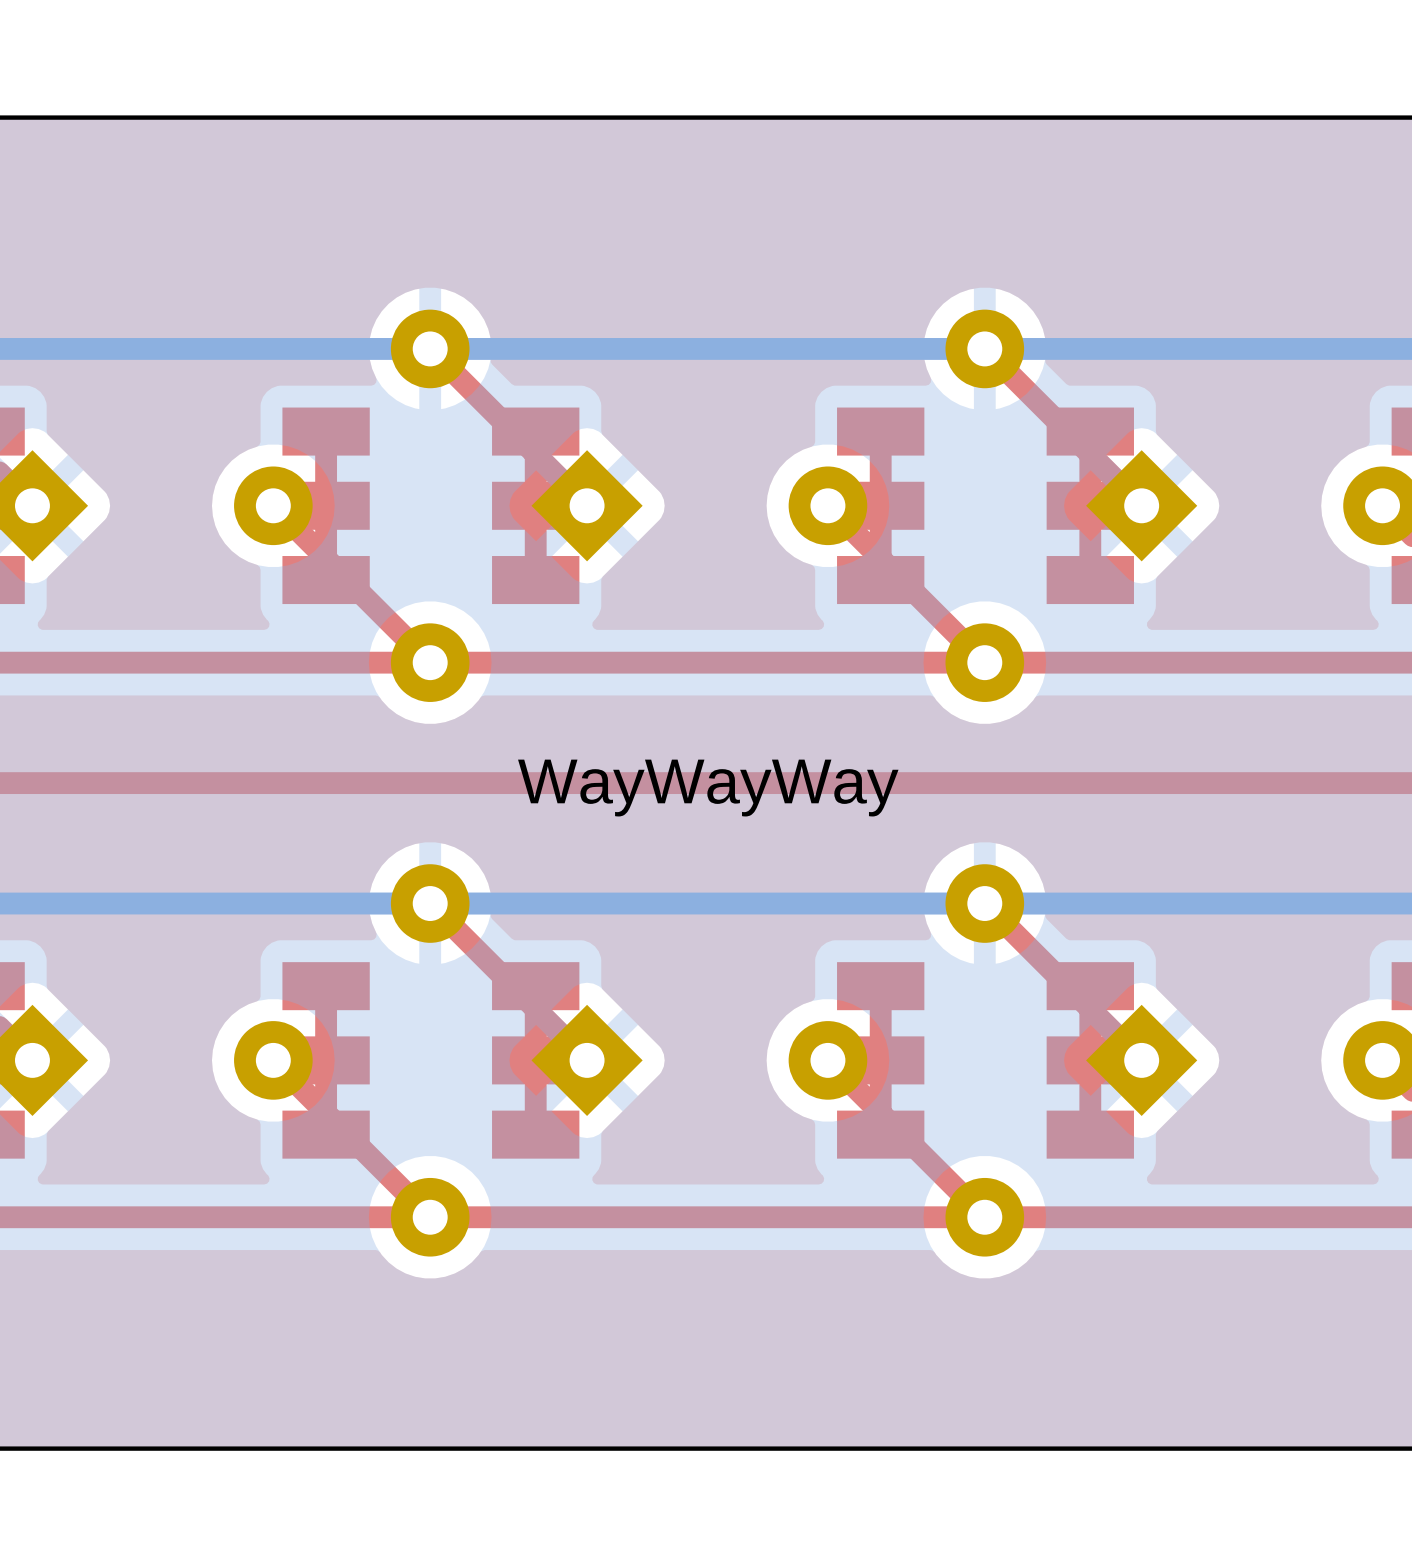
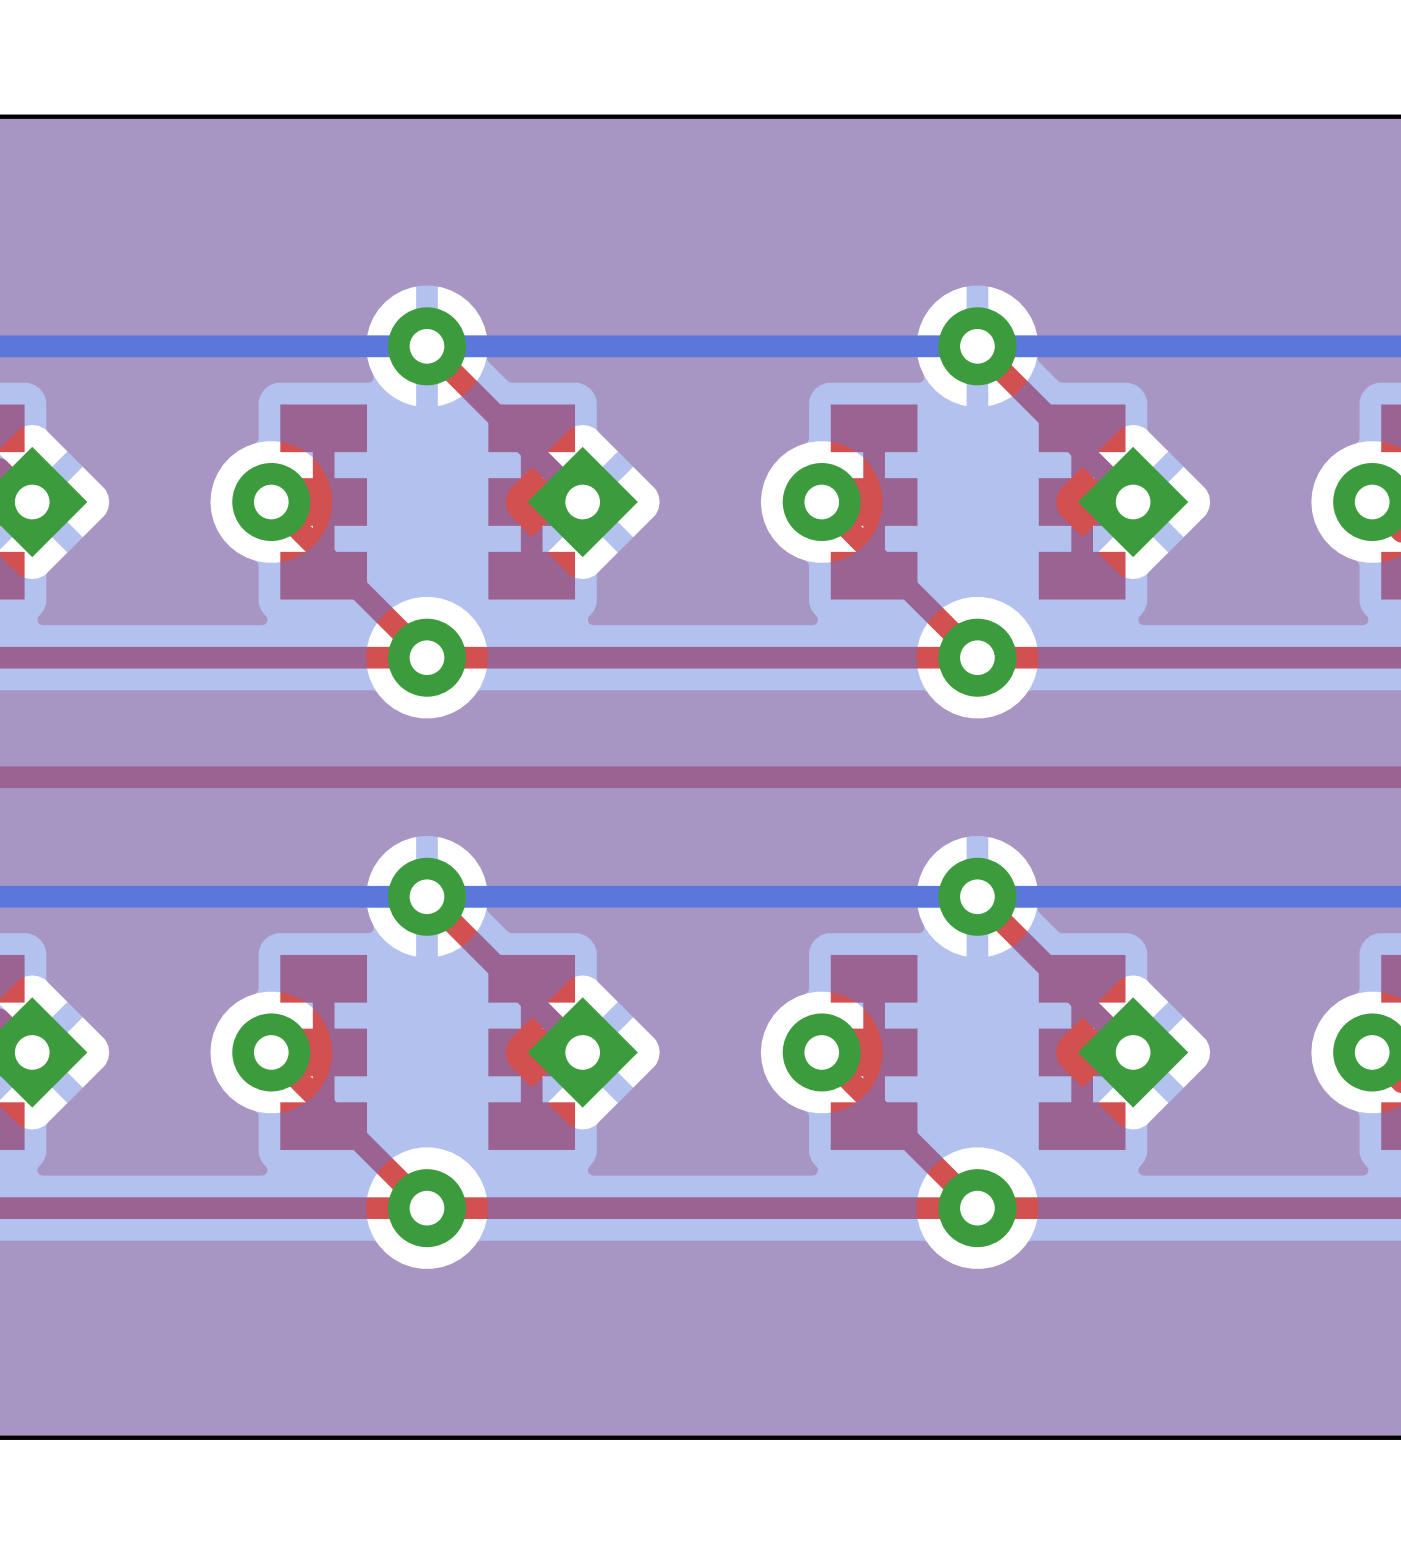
text: WayWayWay (708, 788) -> none

